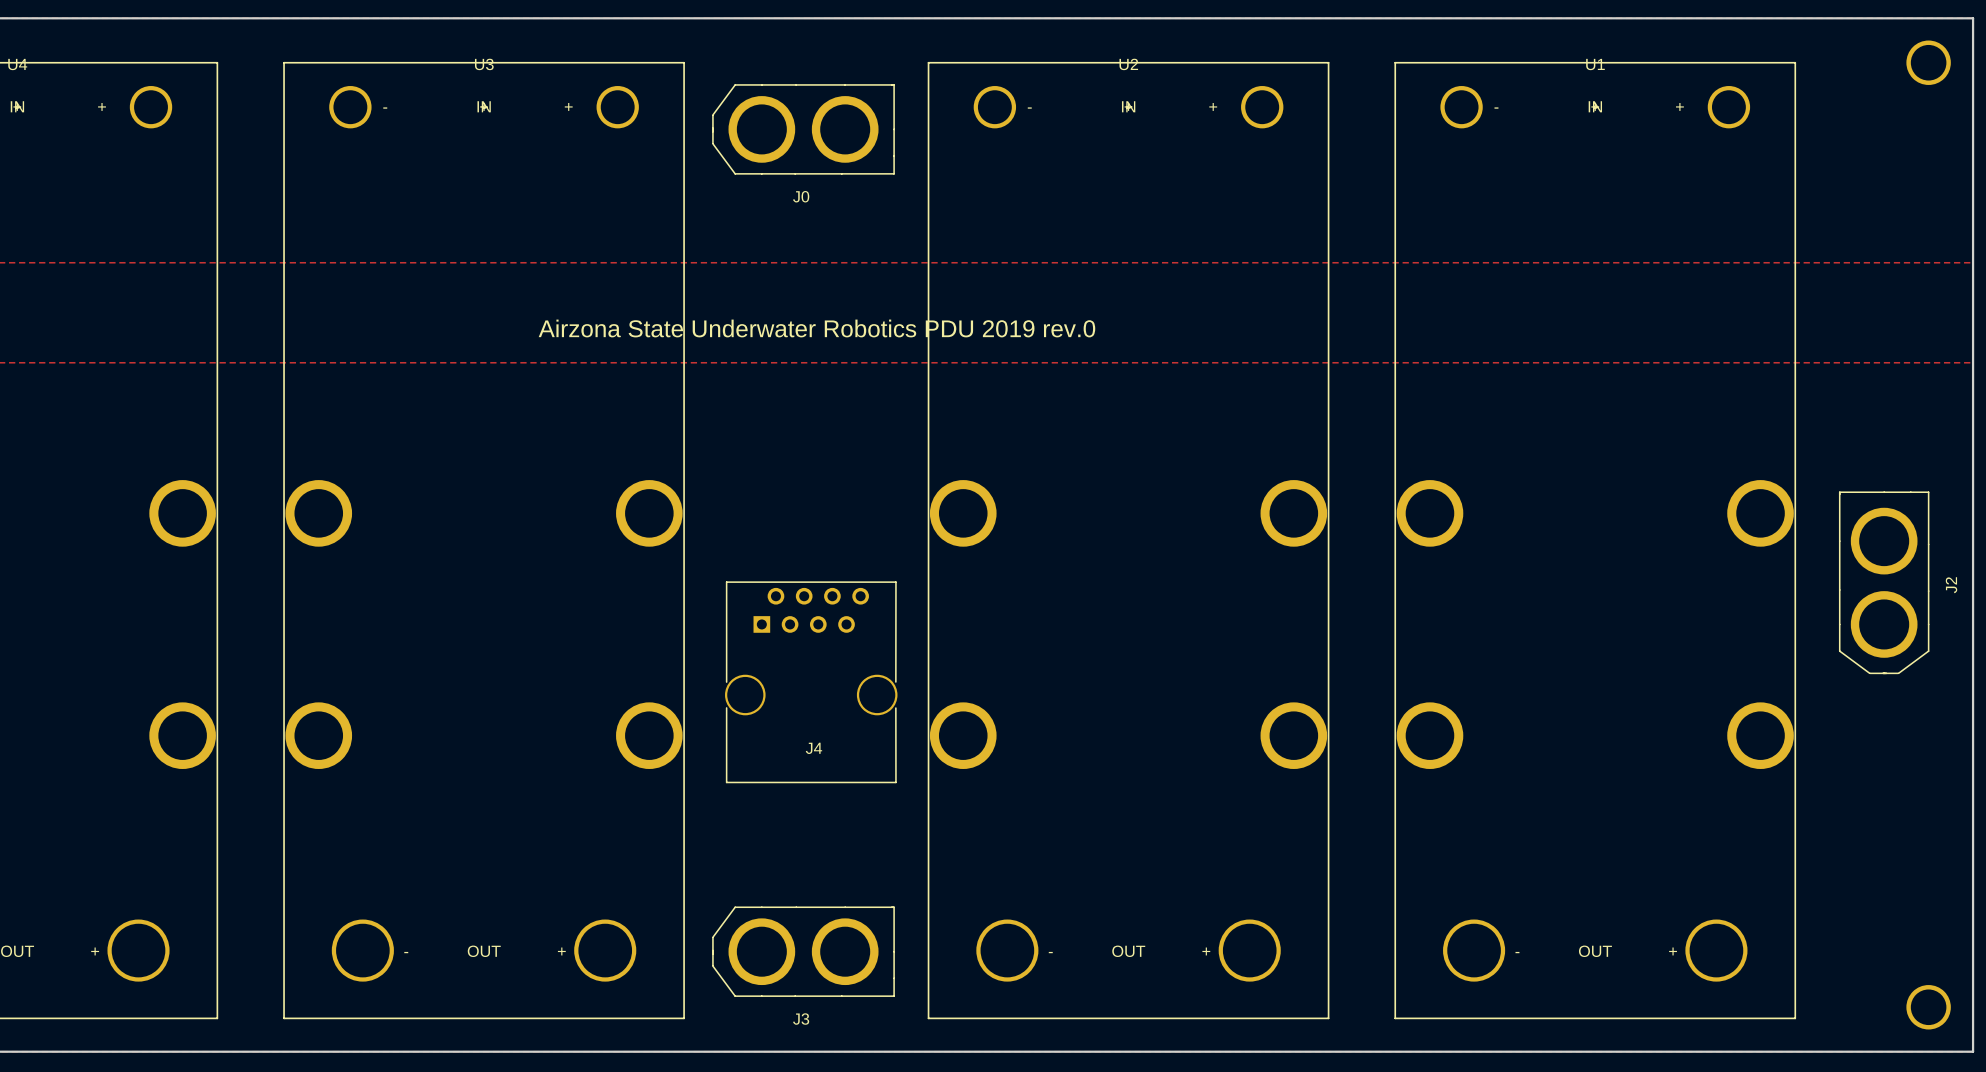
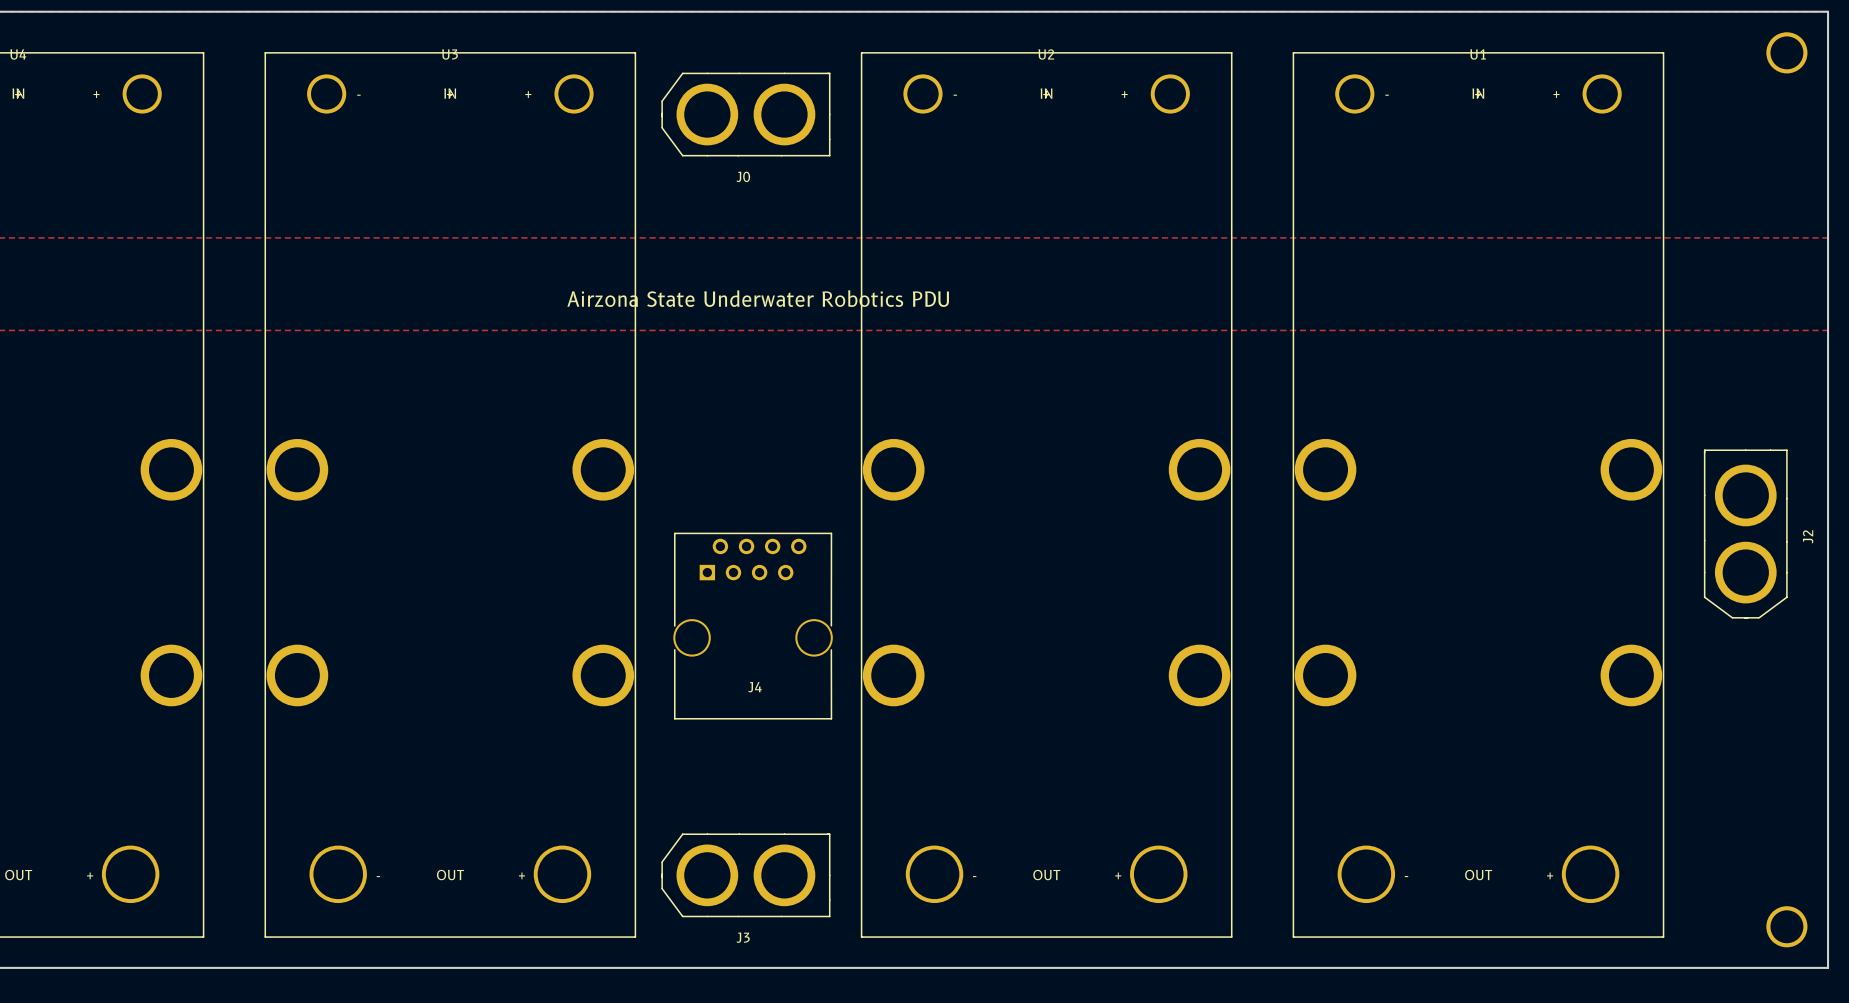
text: Airzona State Underwater Robotics PDU 2019 rev.0 (816, 328) -> Airzona State Underwater Robotics PDU (758, 298)

